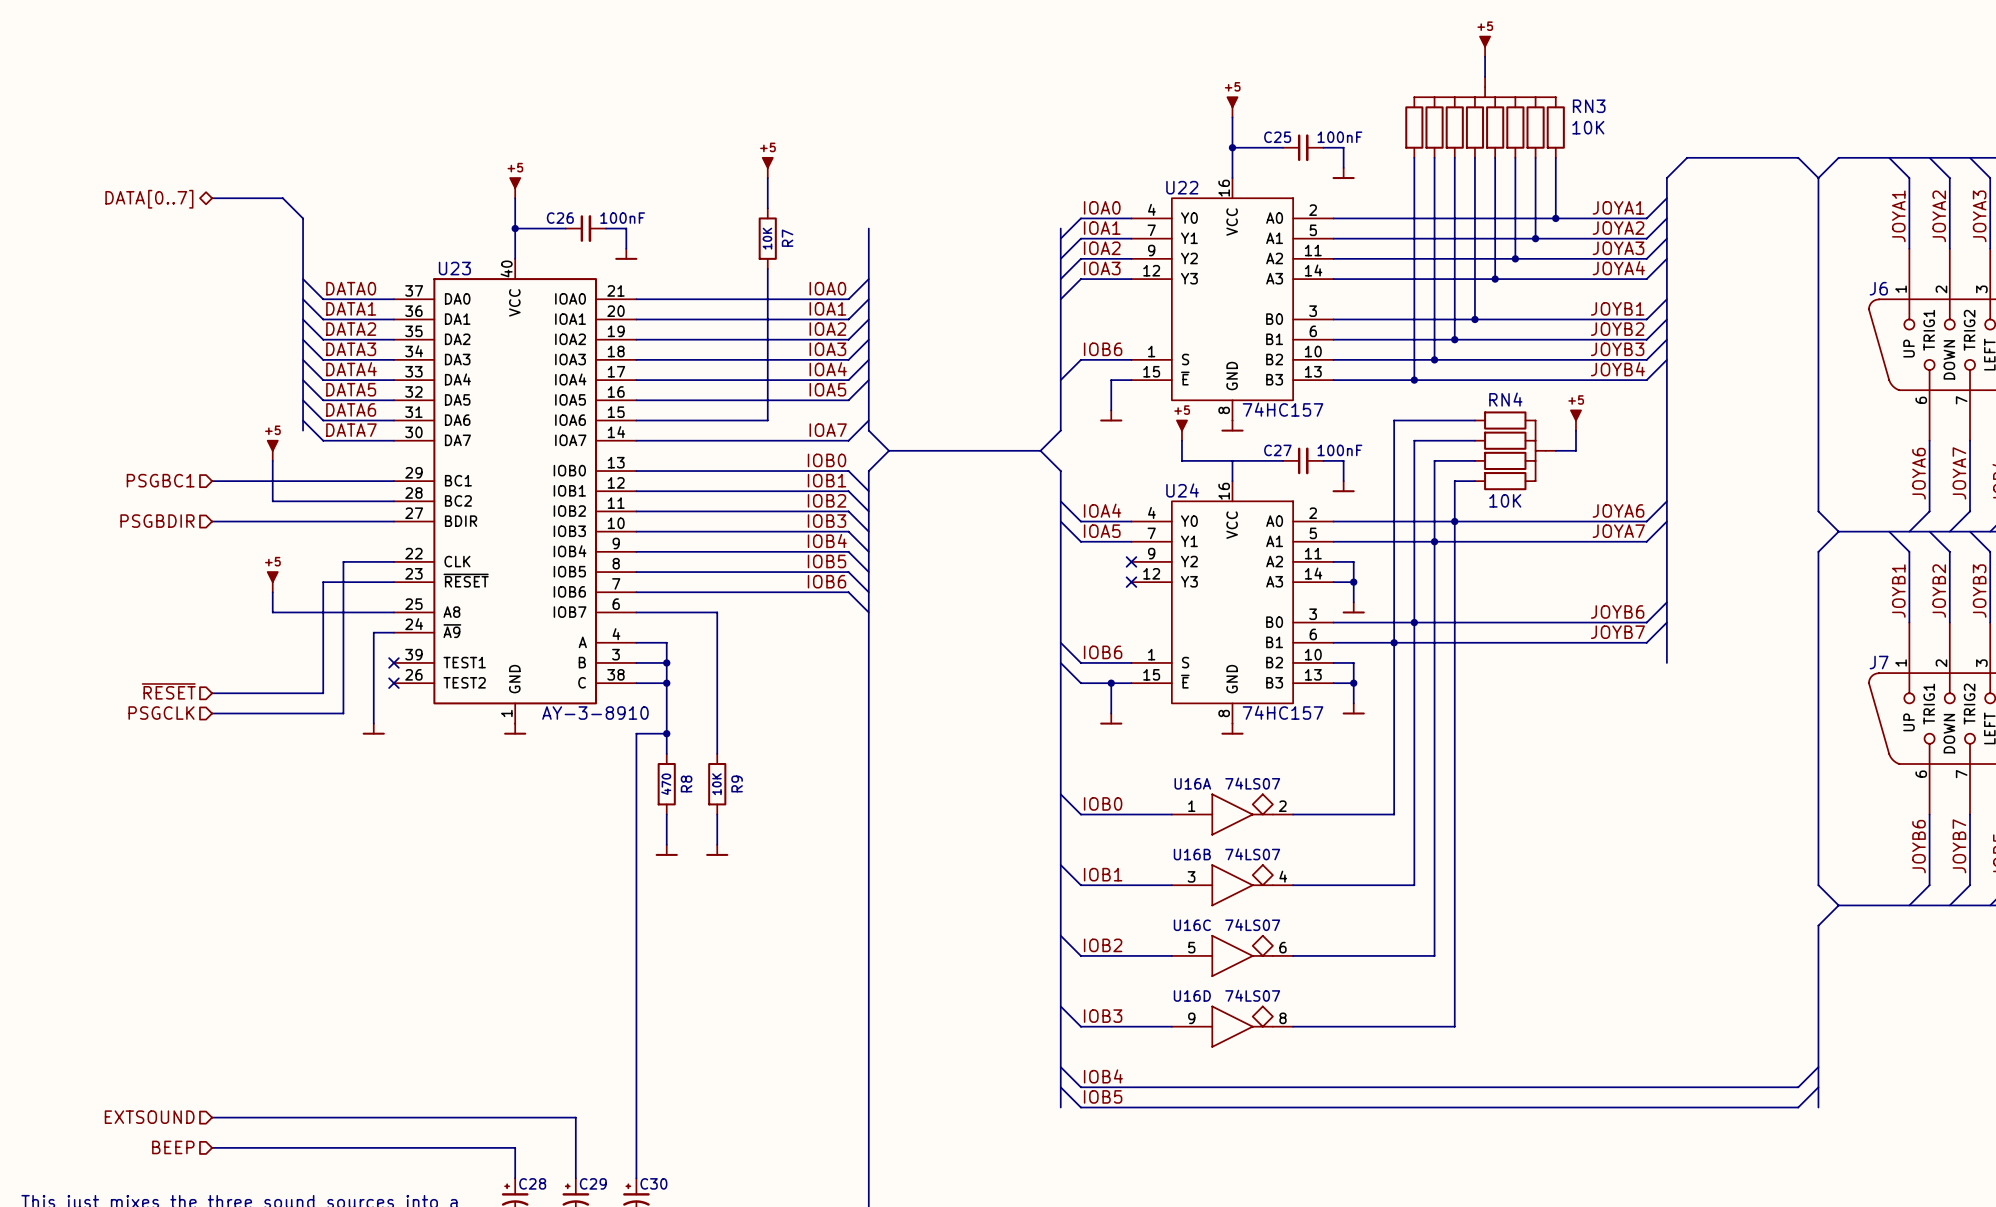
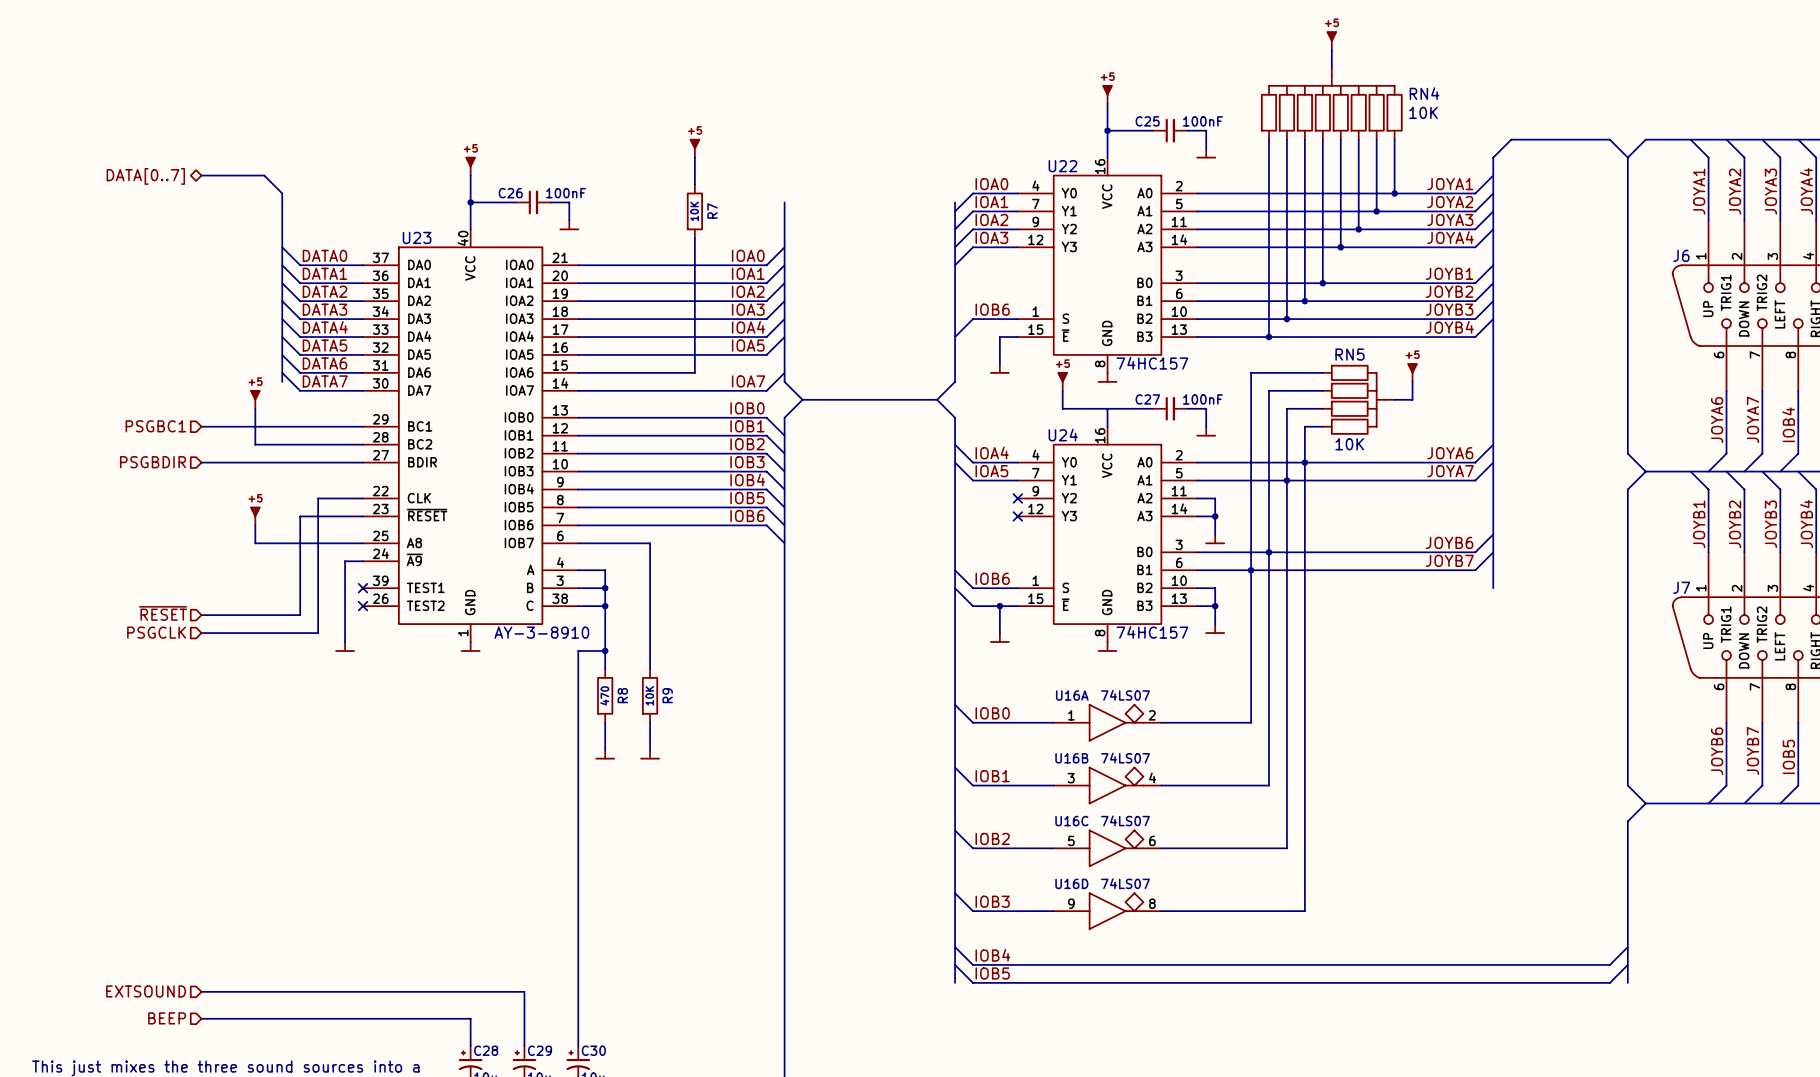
RN3 name: RN3 (1589, 106) -> RN4 (1424, 93)
RN4 name: RN4 (1505, 399) -> RN5 (1350, 354)

